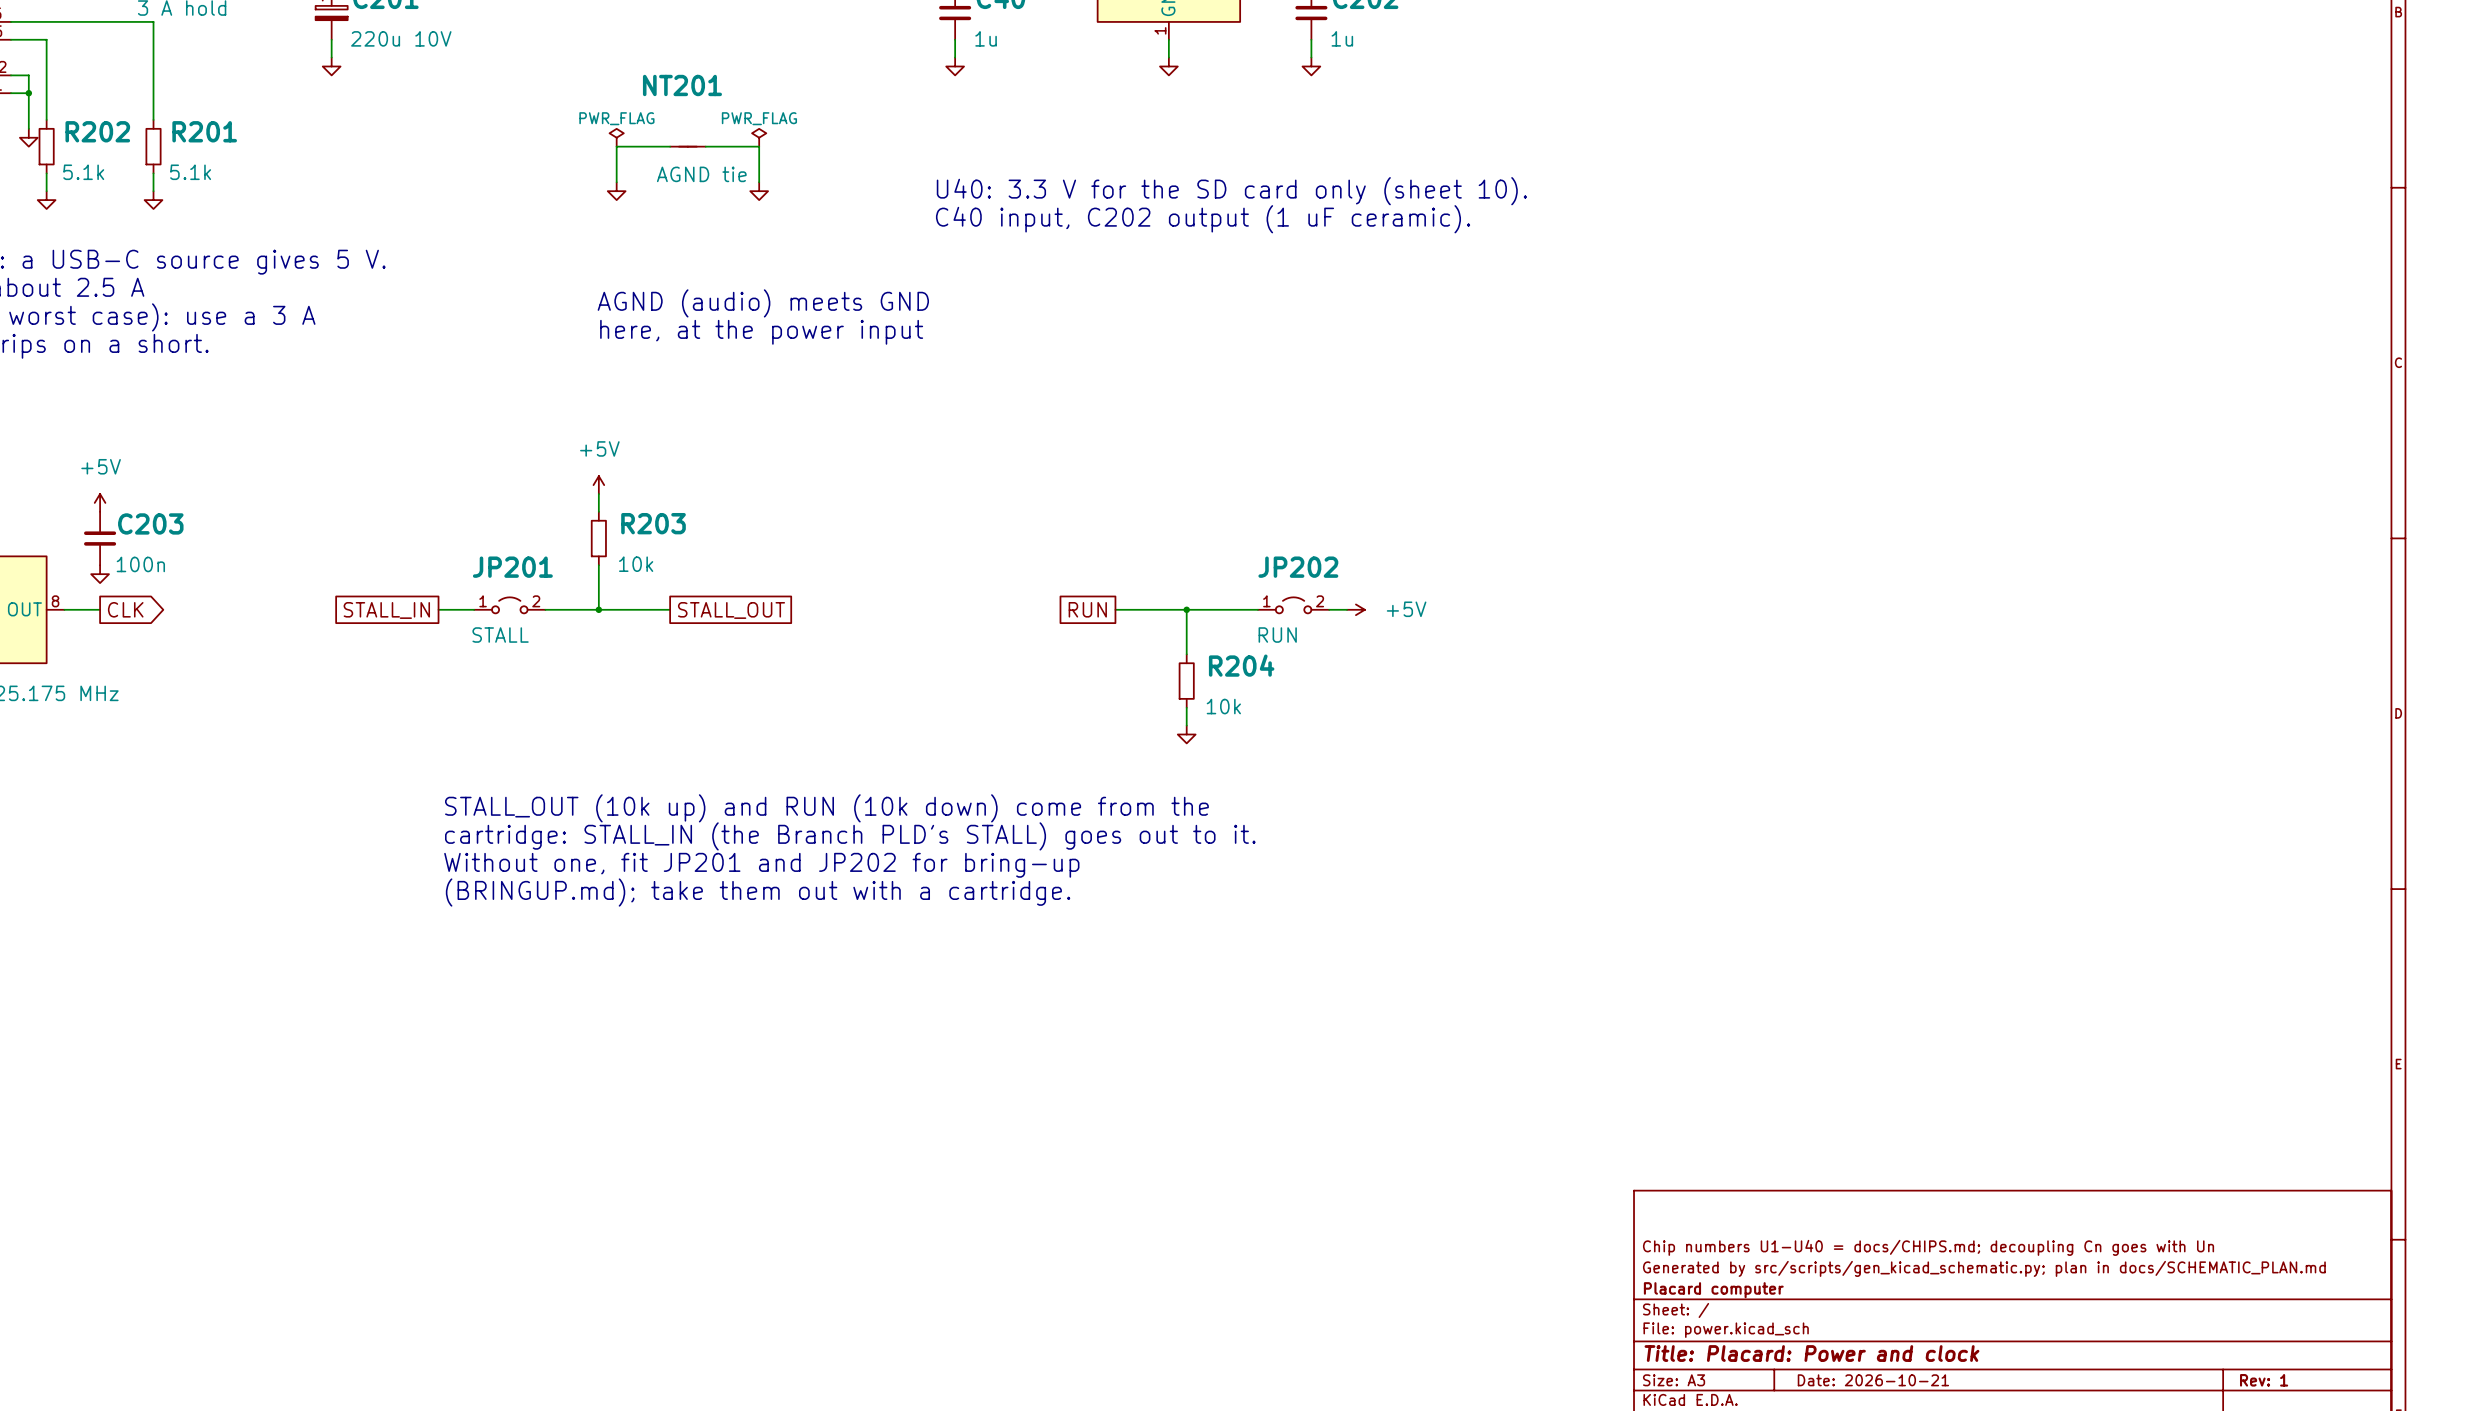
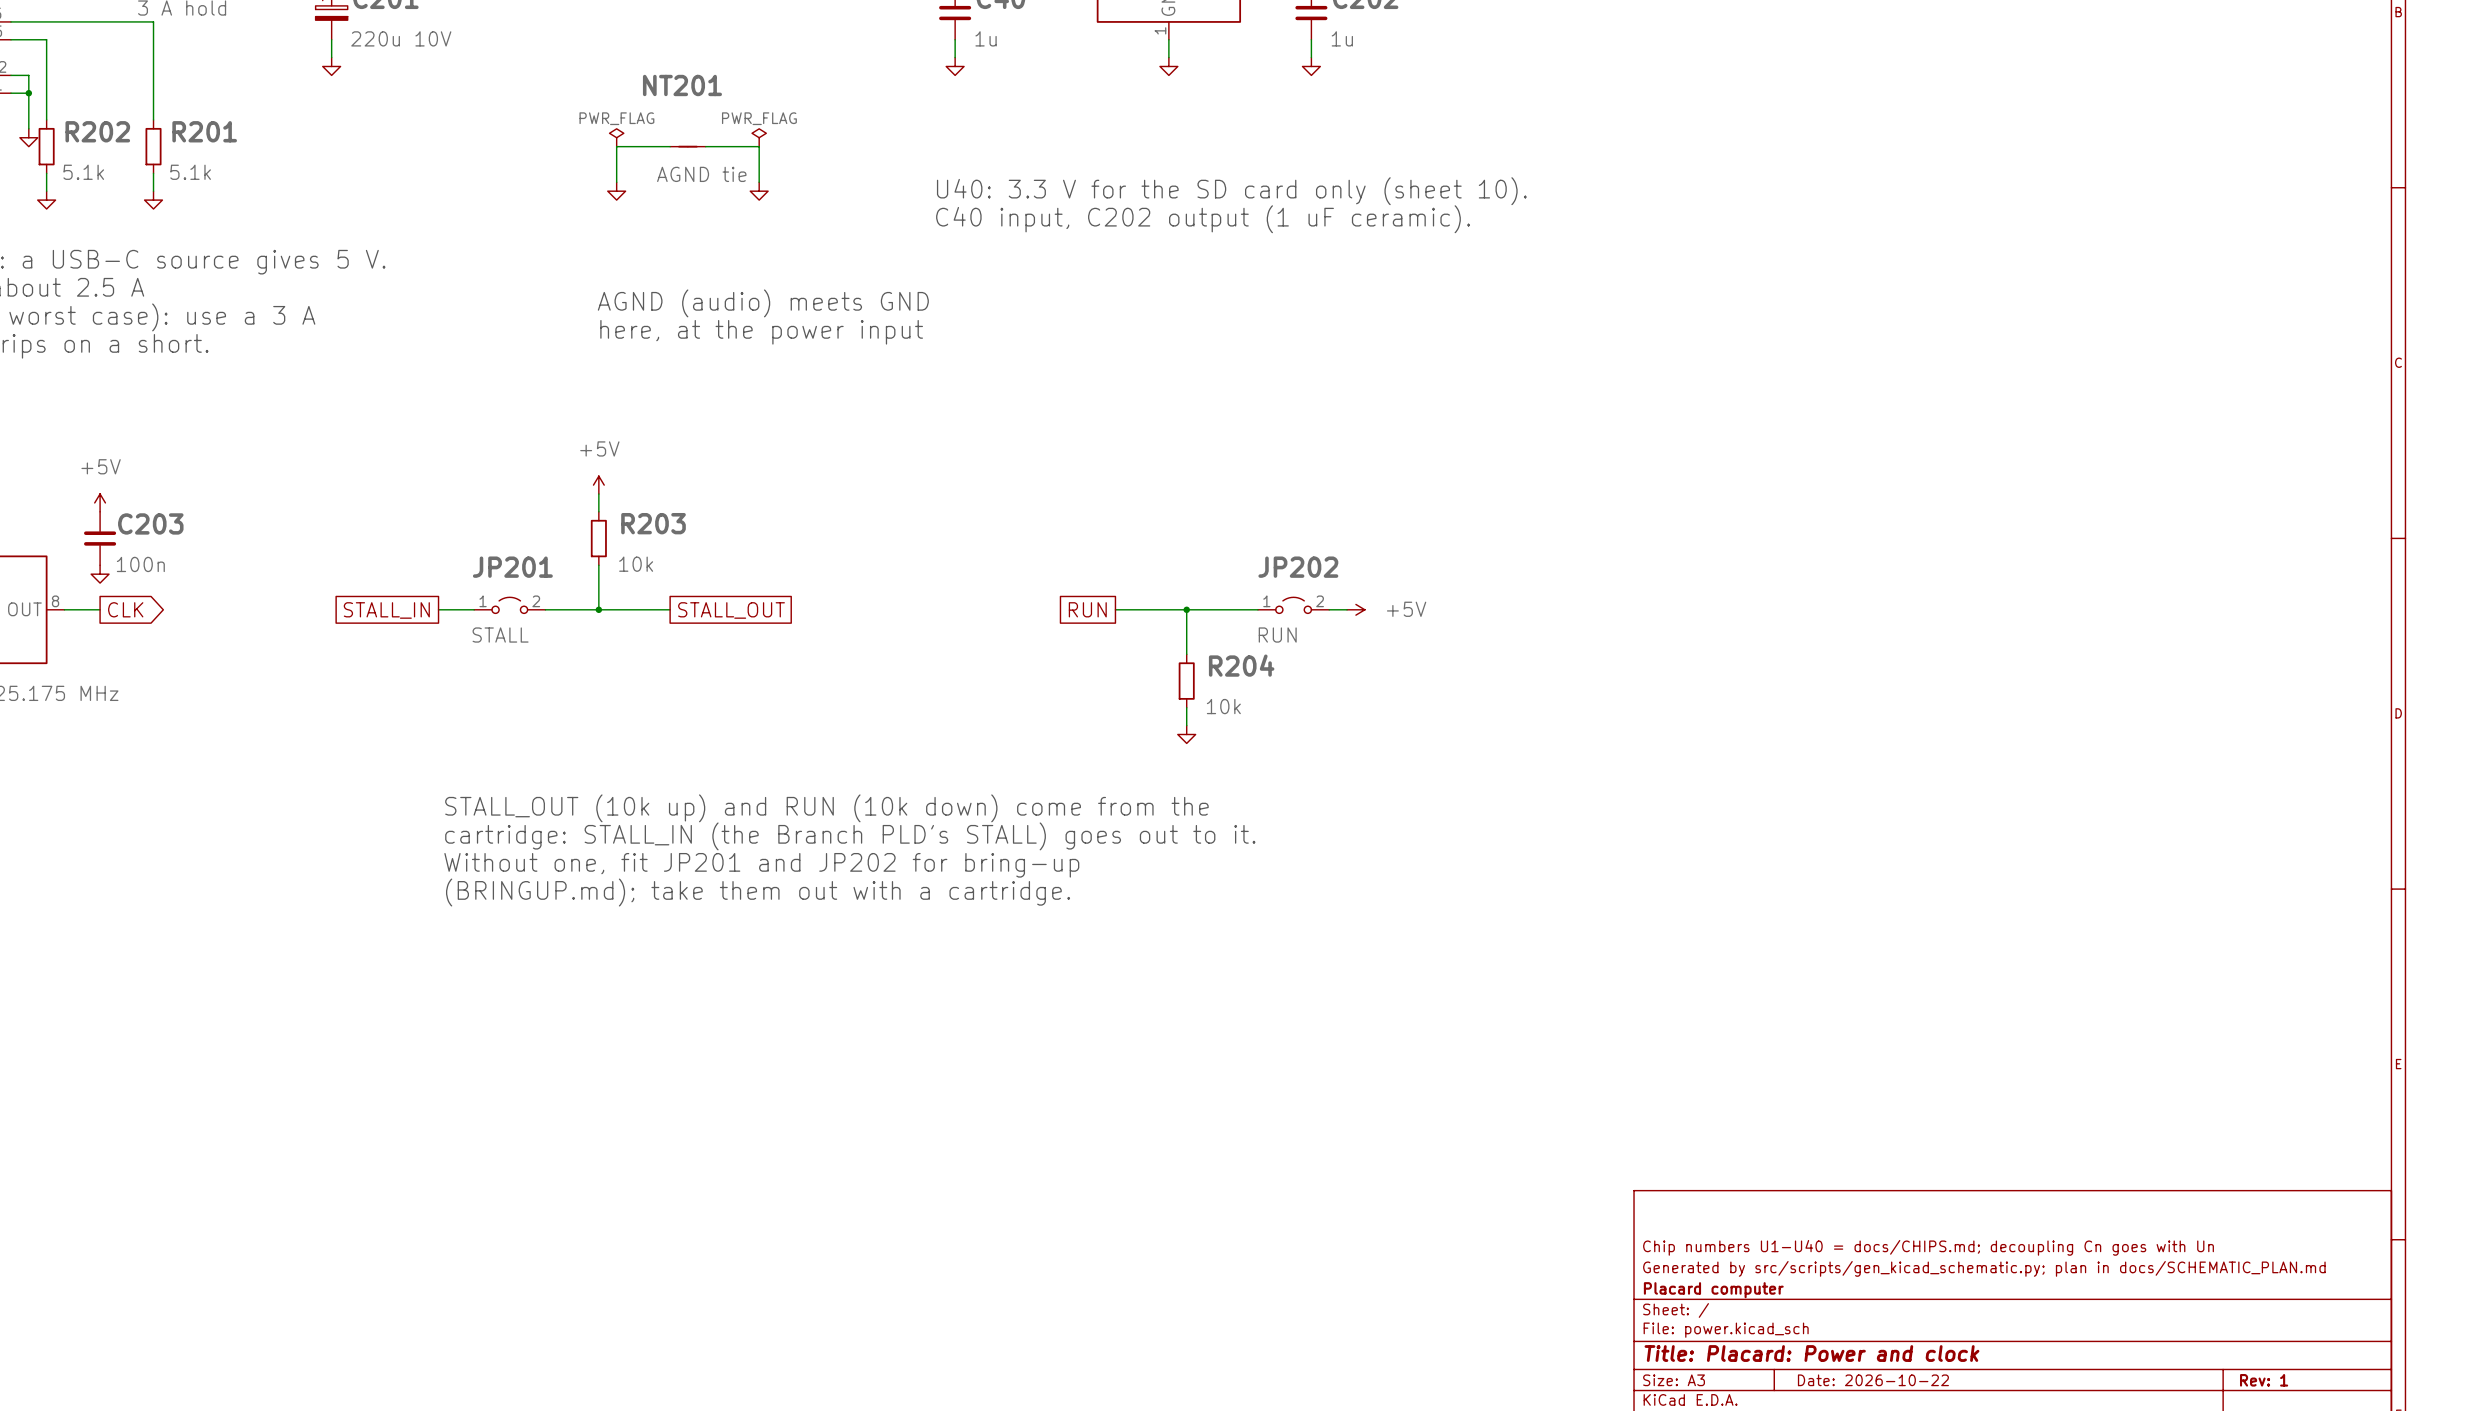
title block: Date: 2026-10-21 (1873, 1380) -> Date: 2026-10-22 (1873, 1380)

